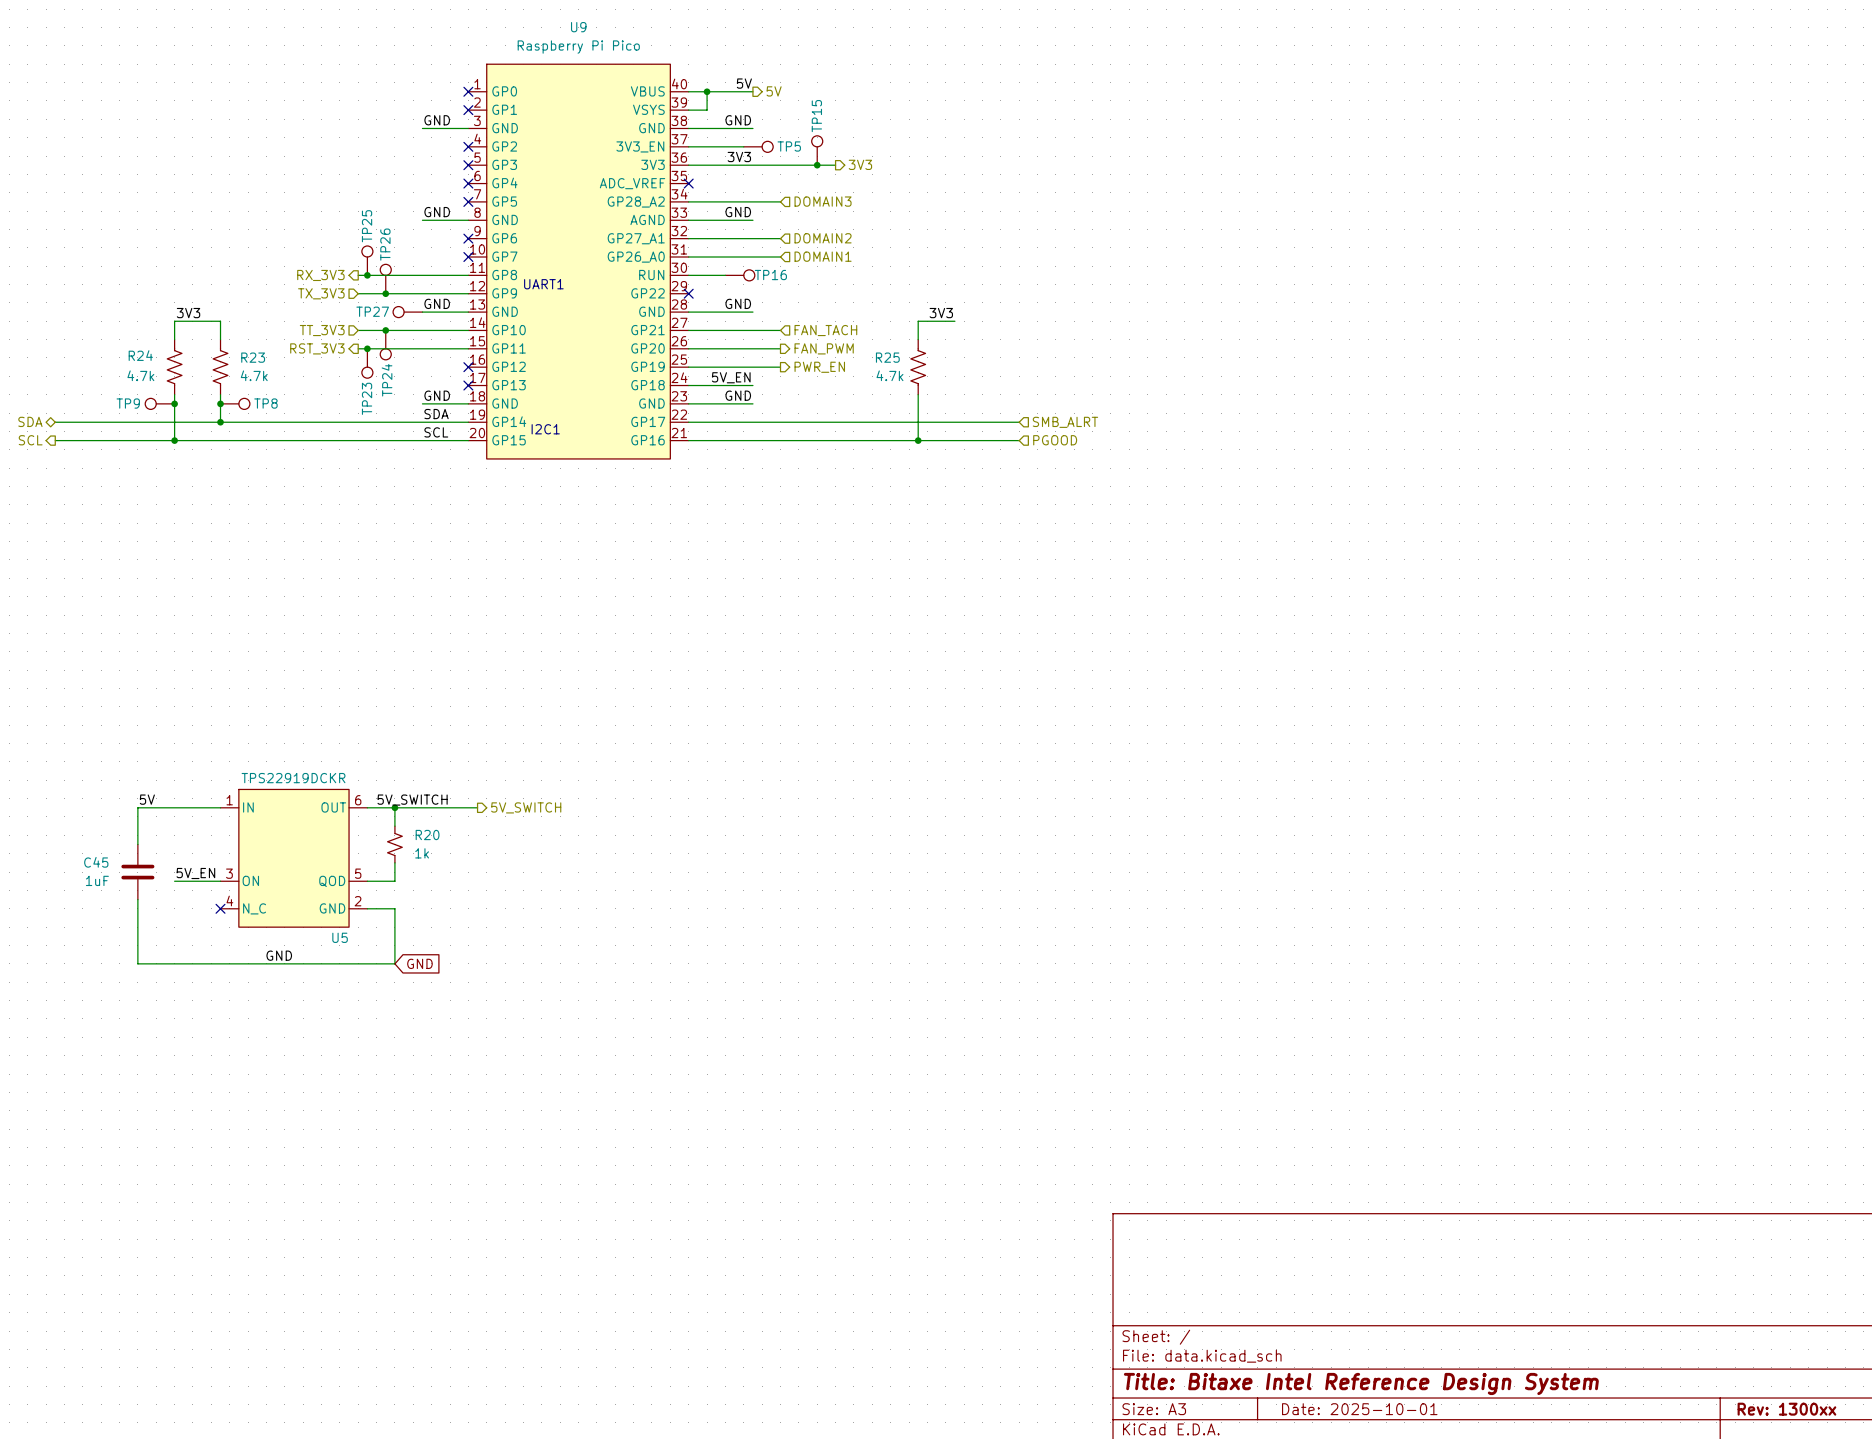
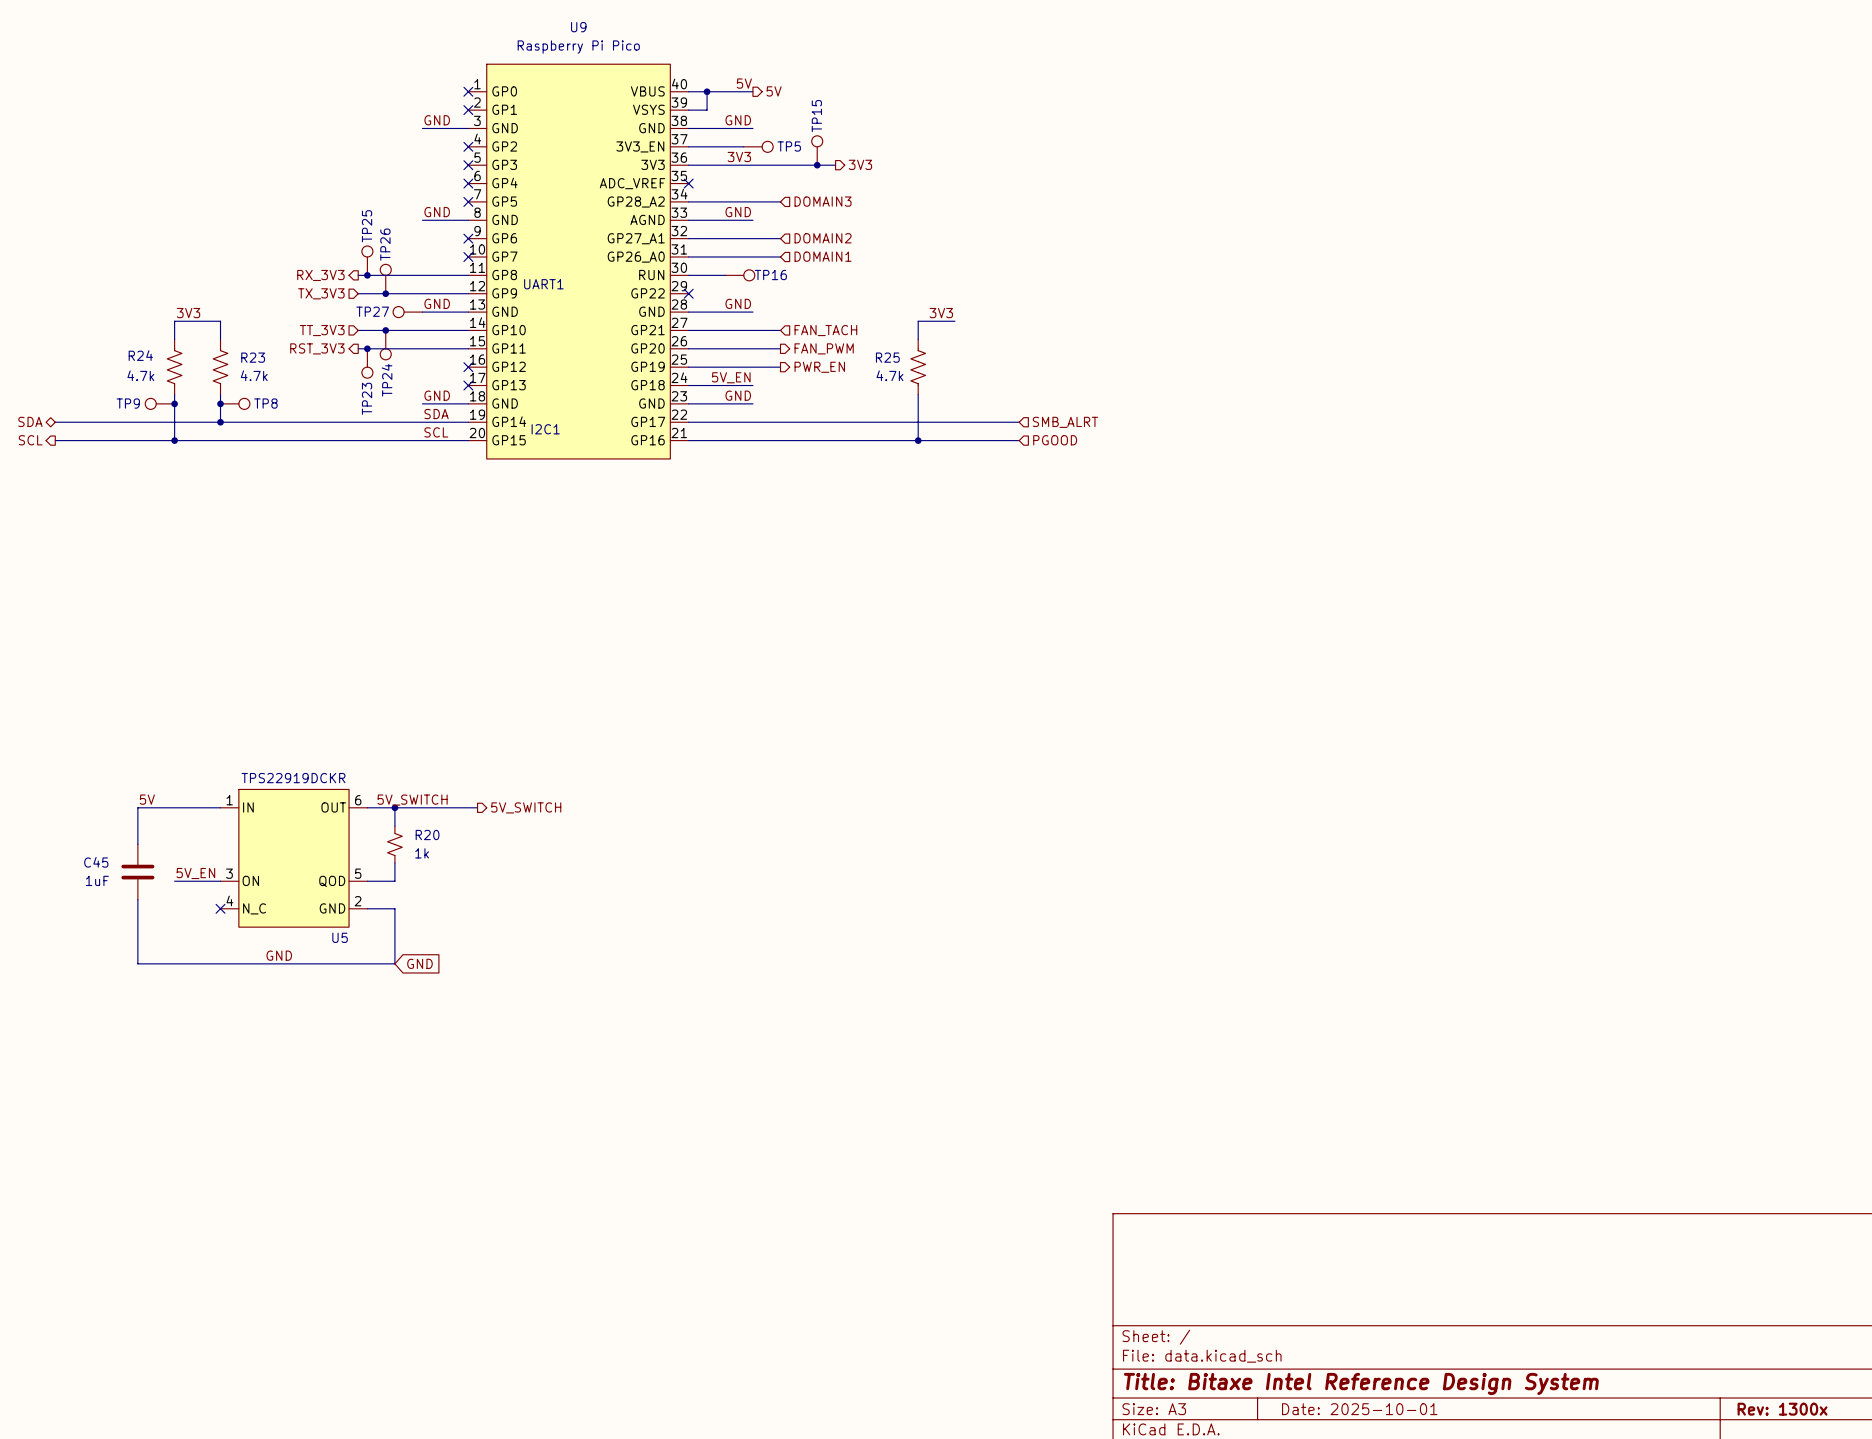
title block: Rev: 1300xx (1786, 1409) -> Rev: 1300x (1782, 1409)

